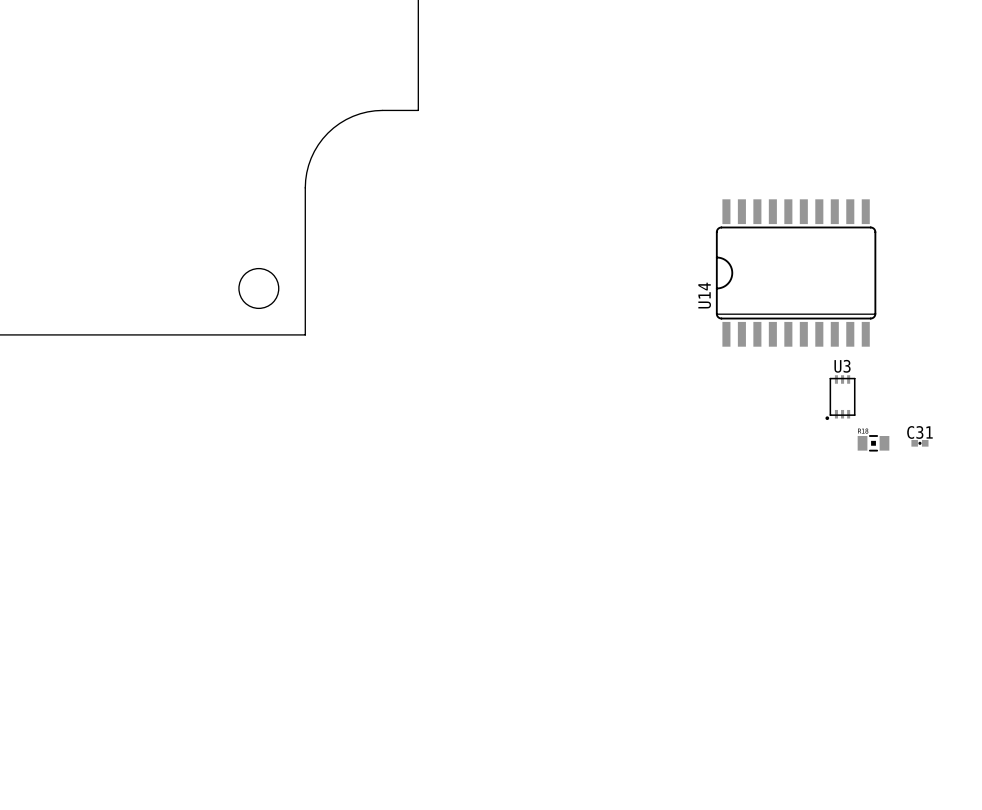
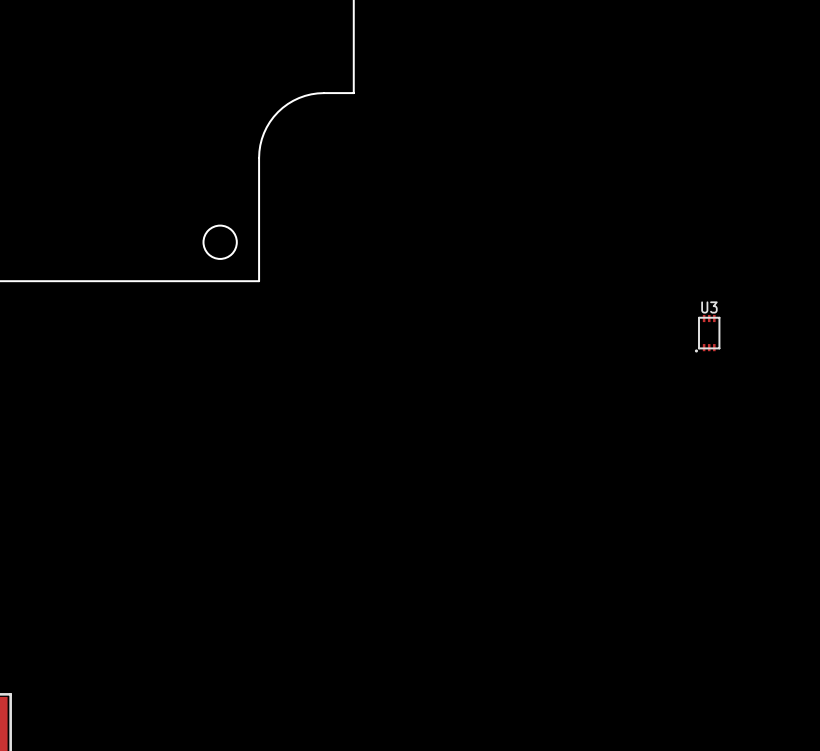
U14: (796, 273) -> none
part: (873, 443) -> none
C31: (919, 443) -> none

